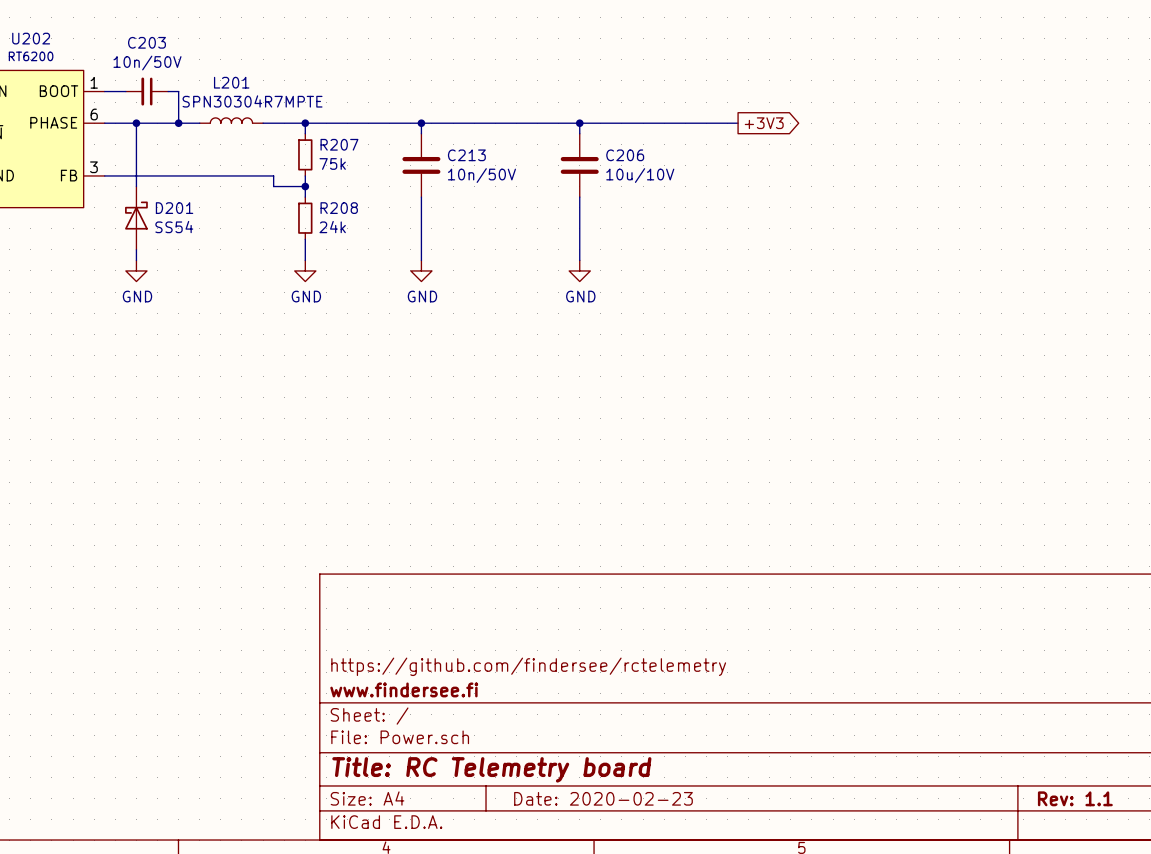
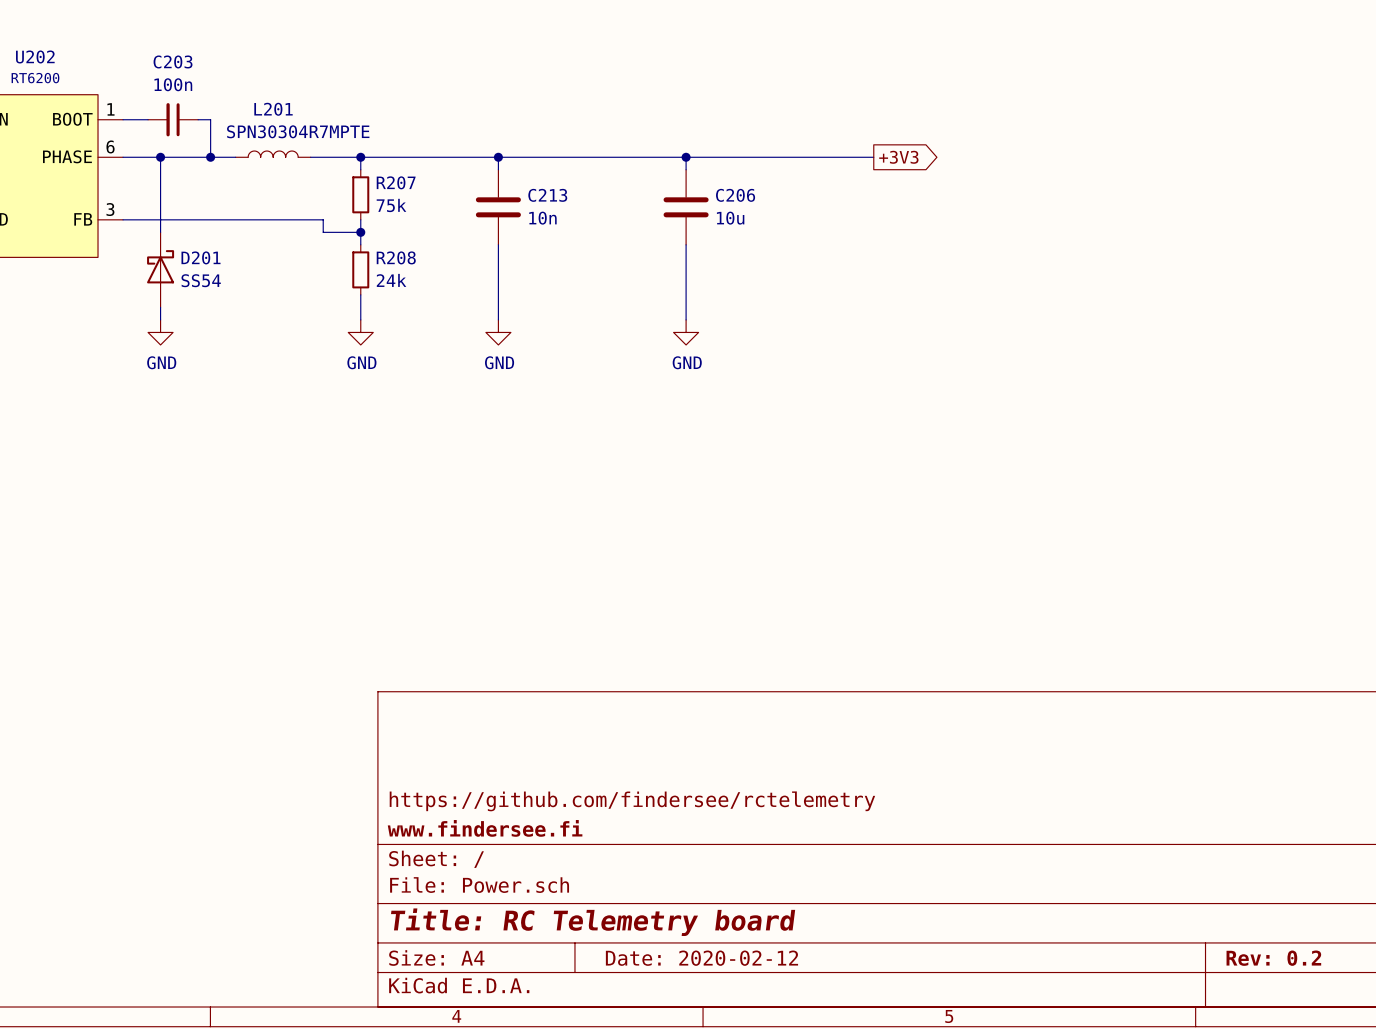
C203 value: 10n/50V (147, 63) -> 100n (173, 84)
C213 value: 10n/50V (481, 175) -> 10n (542, 218)
C206 value: 10u/10V (640, 175) -> 10u (730, 218)
title block: Date: 2020-02-23 (603, 798) -> Date: 2020-02-12 (701, 958)
title block: Rev: 1.1 (1075, 798) -> Rev: 0.2 (1273, 958)

